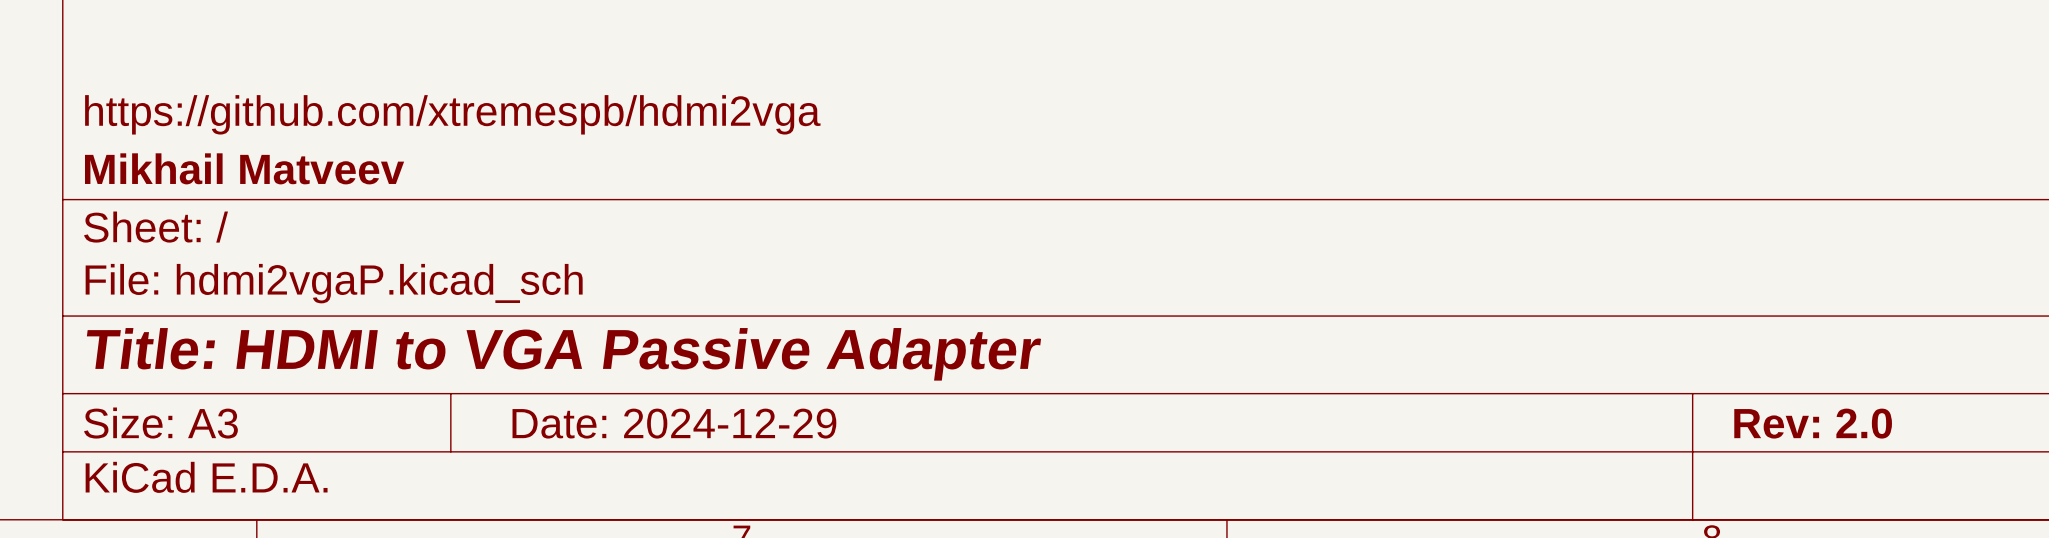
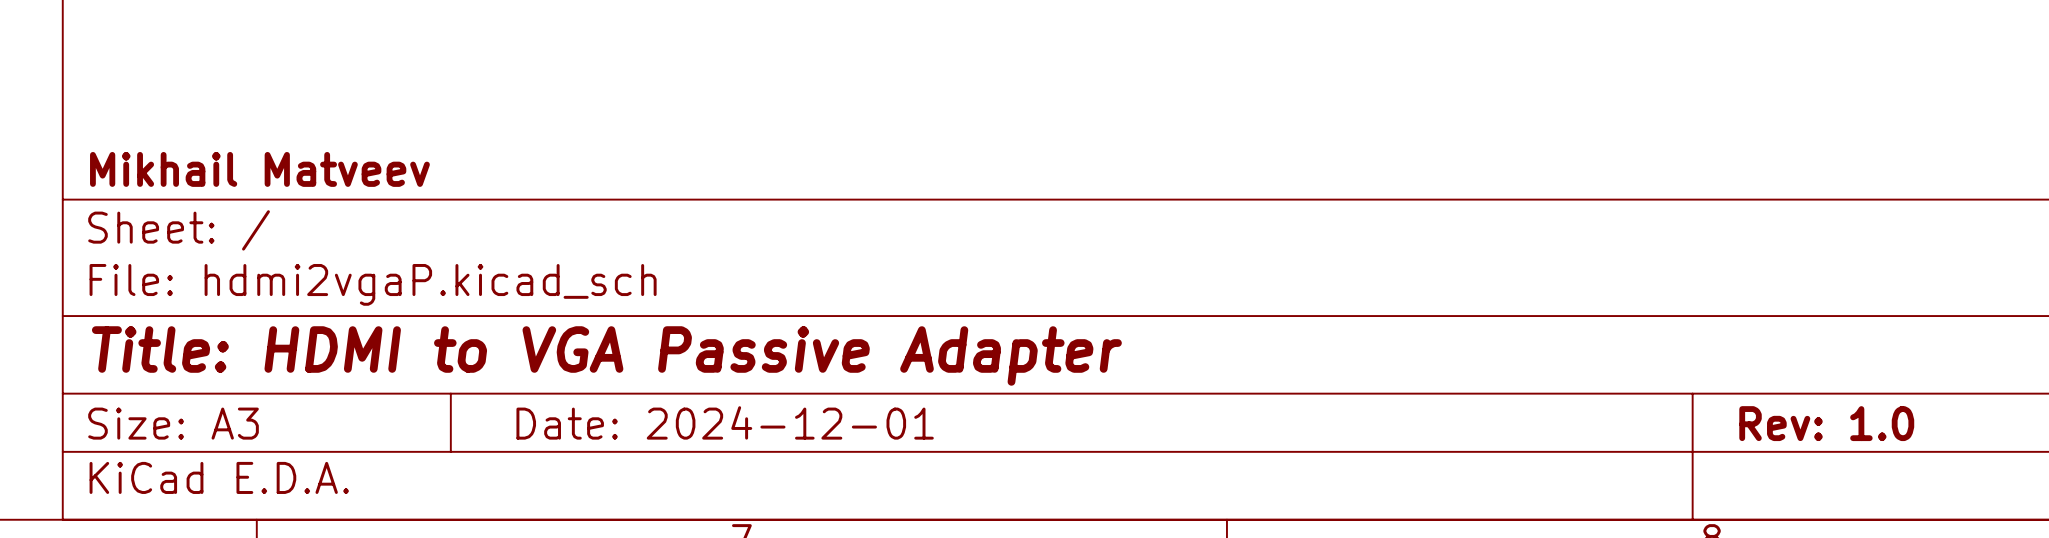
title block: https://github.com/xtremespb/hdmi2vga (452, 114) -> none
title block: Date: 2024-12-29 (674, 423) -> Date: 2024-12-01 (725, 422)
title block: Rev: 2.0 (1813, 423) -> Rev: 1.0 (1826, 423)

